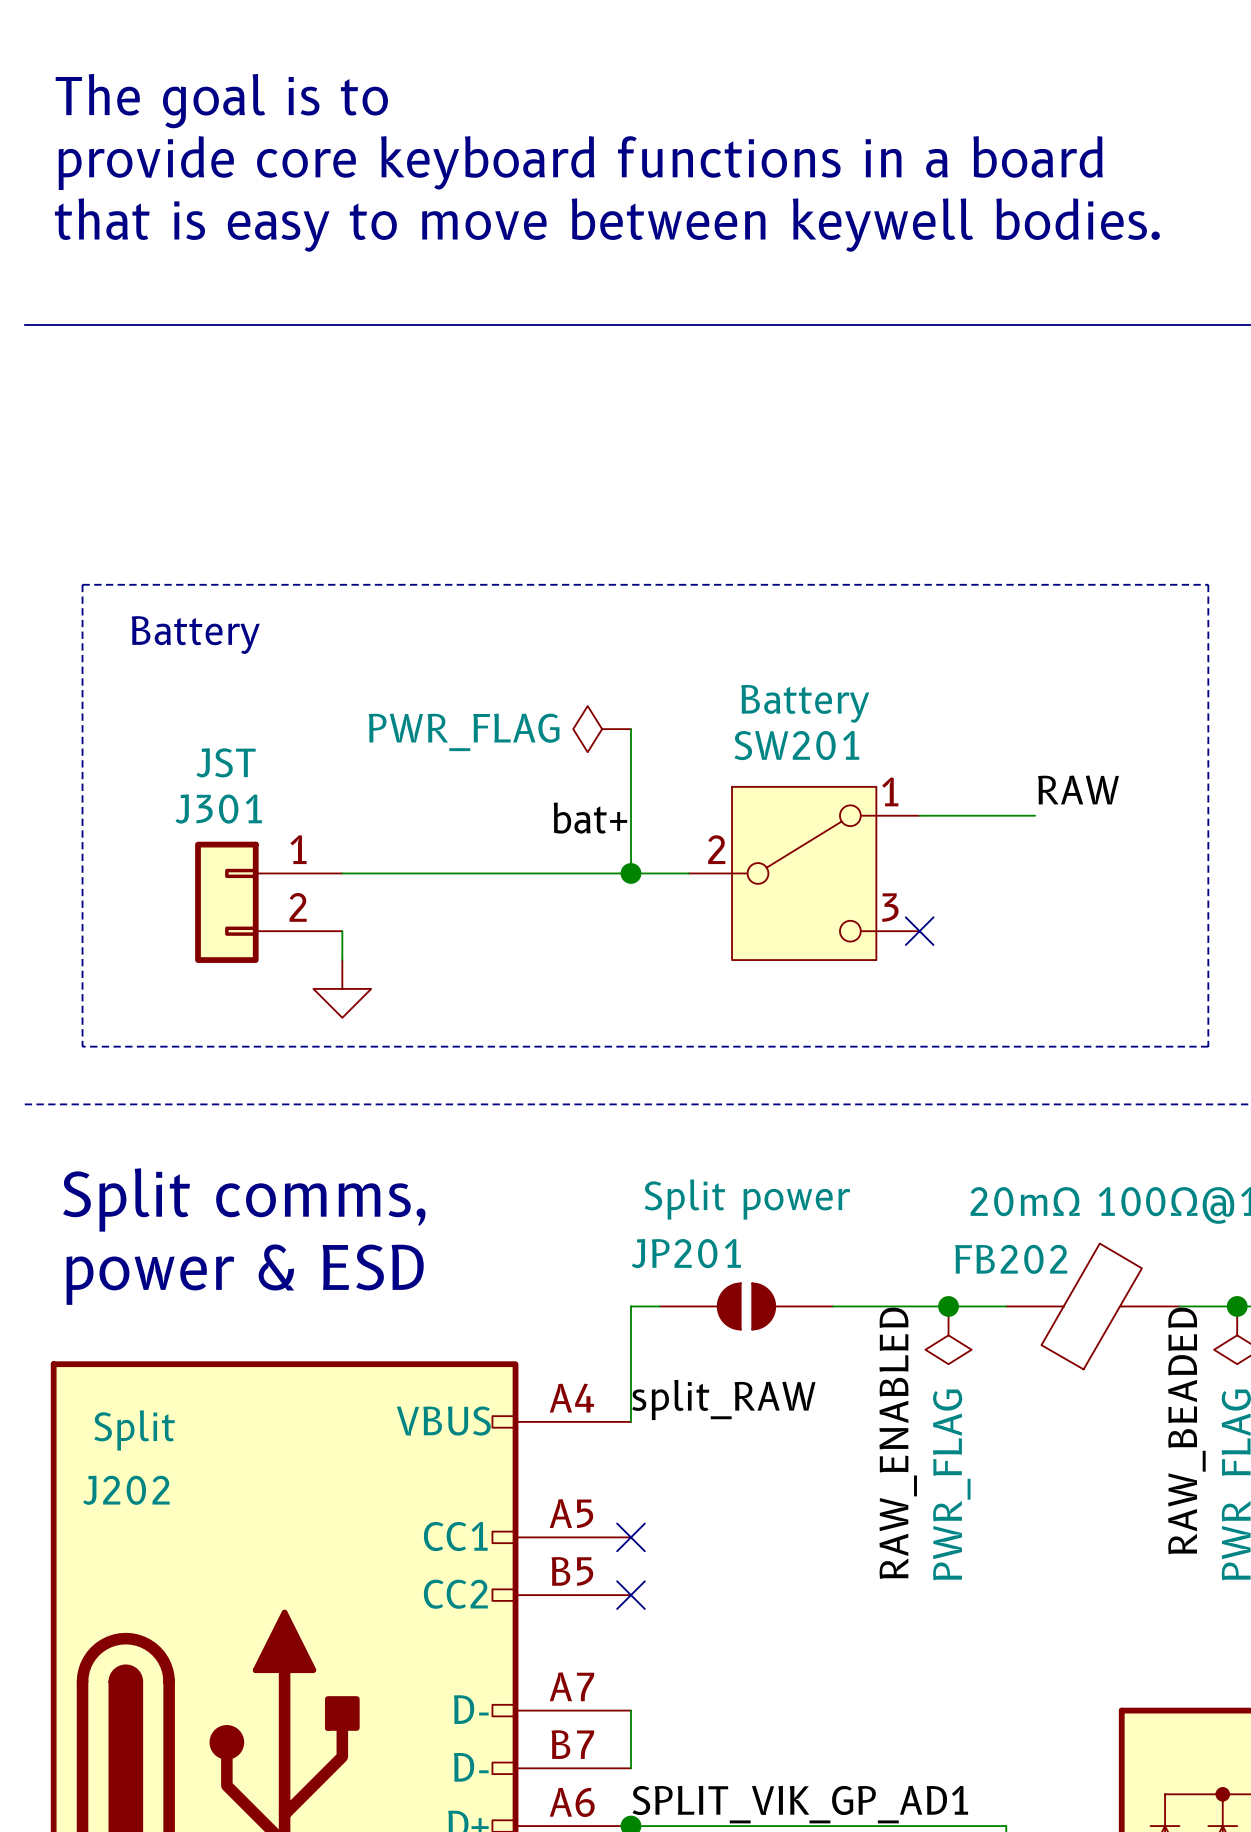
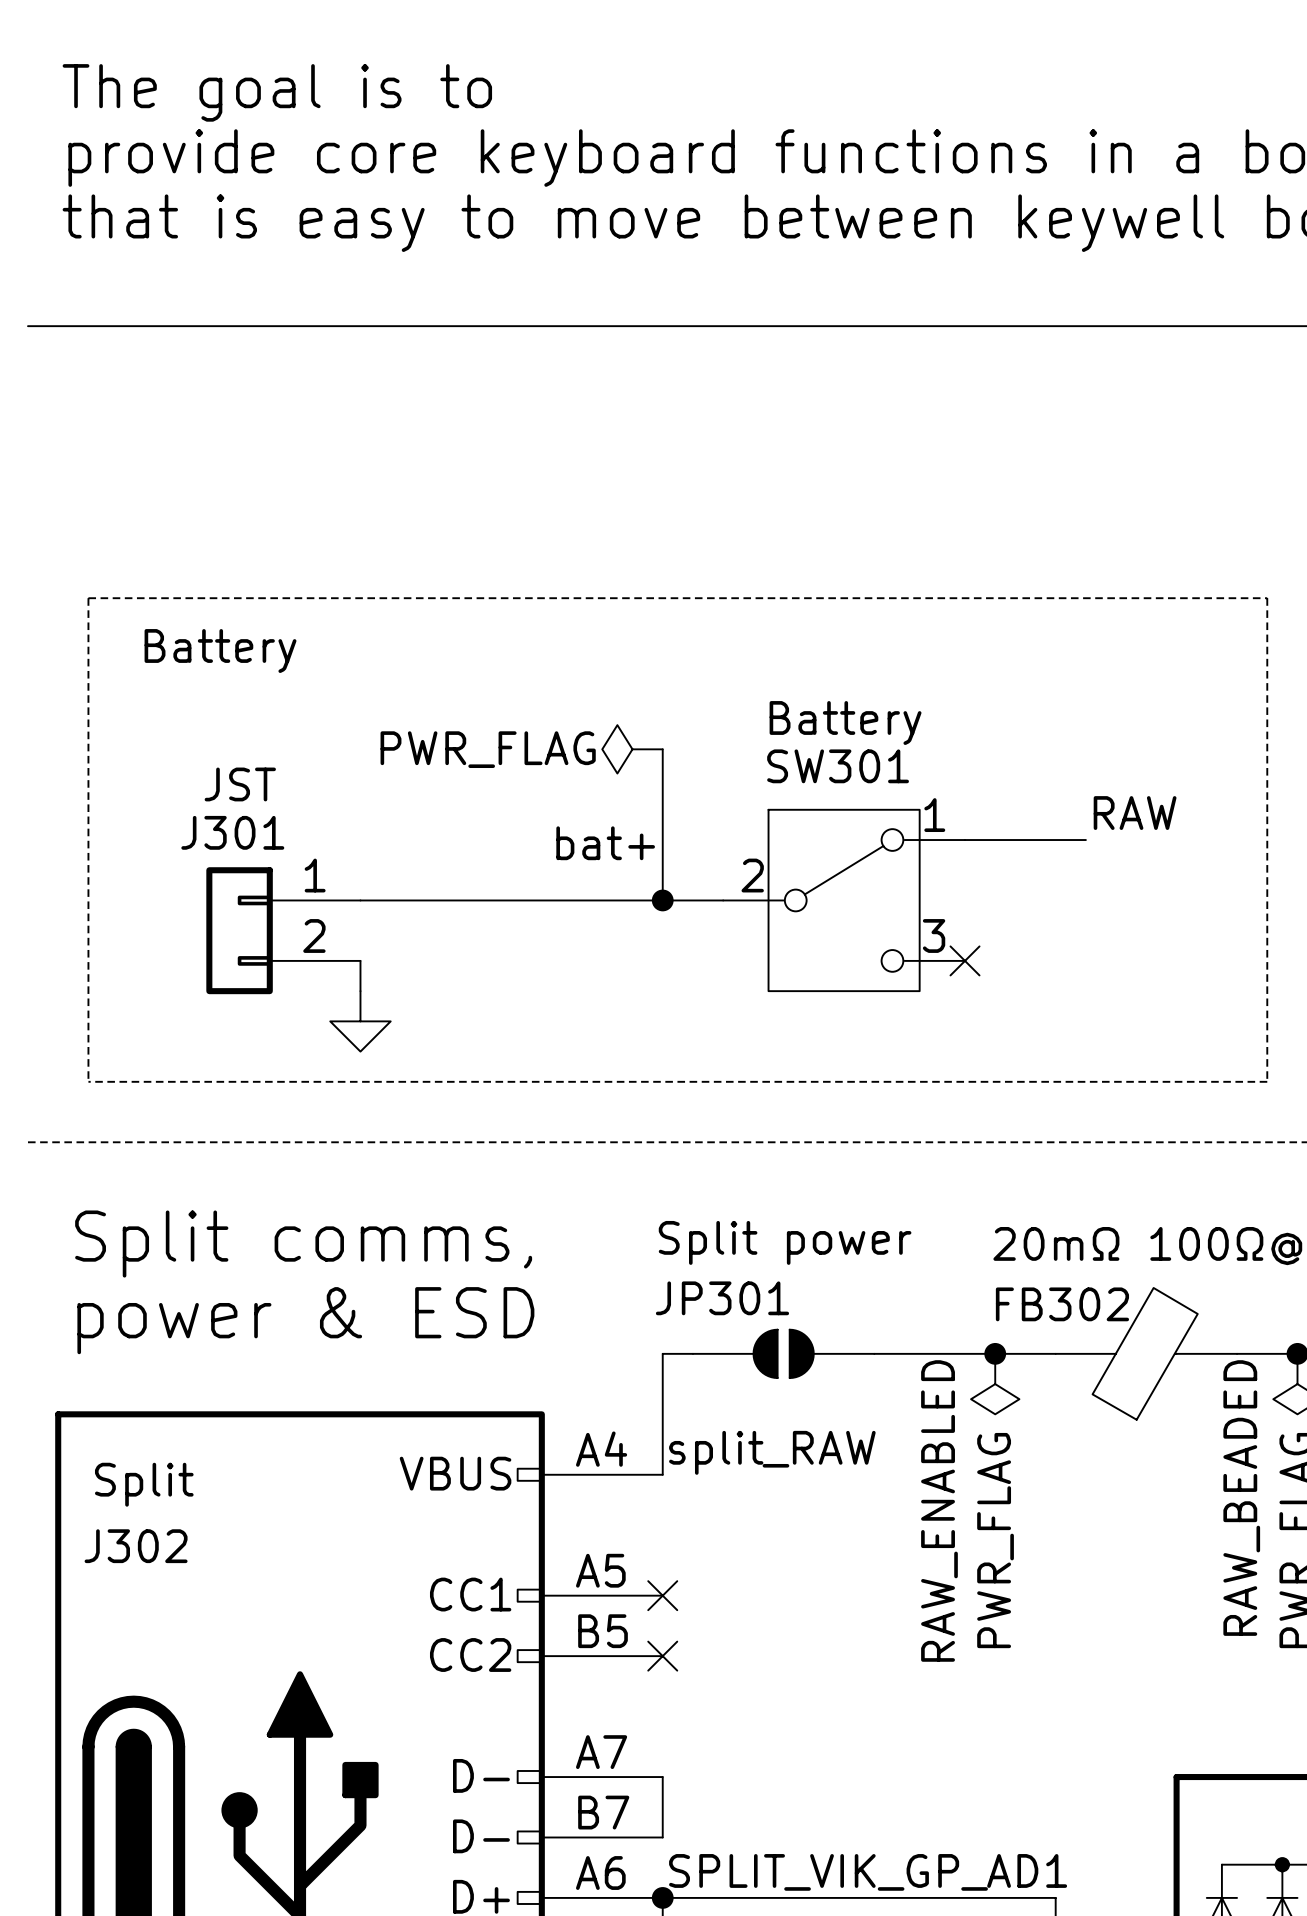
SW201 name: SW201 (796, 745) -> SW301 (838, 766)
JP201 name: JP201 (686, 1253) -> JP301 (722, 1298)
FB202 name: FB202 (1011, 1259) -> FB302 (1062, 1304)
J202 name: J202 (126, 1490) -> J302 (136, 1546)

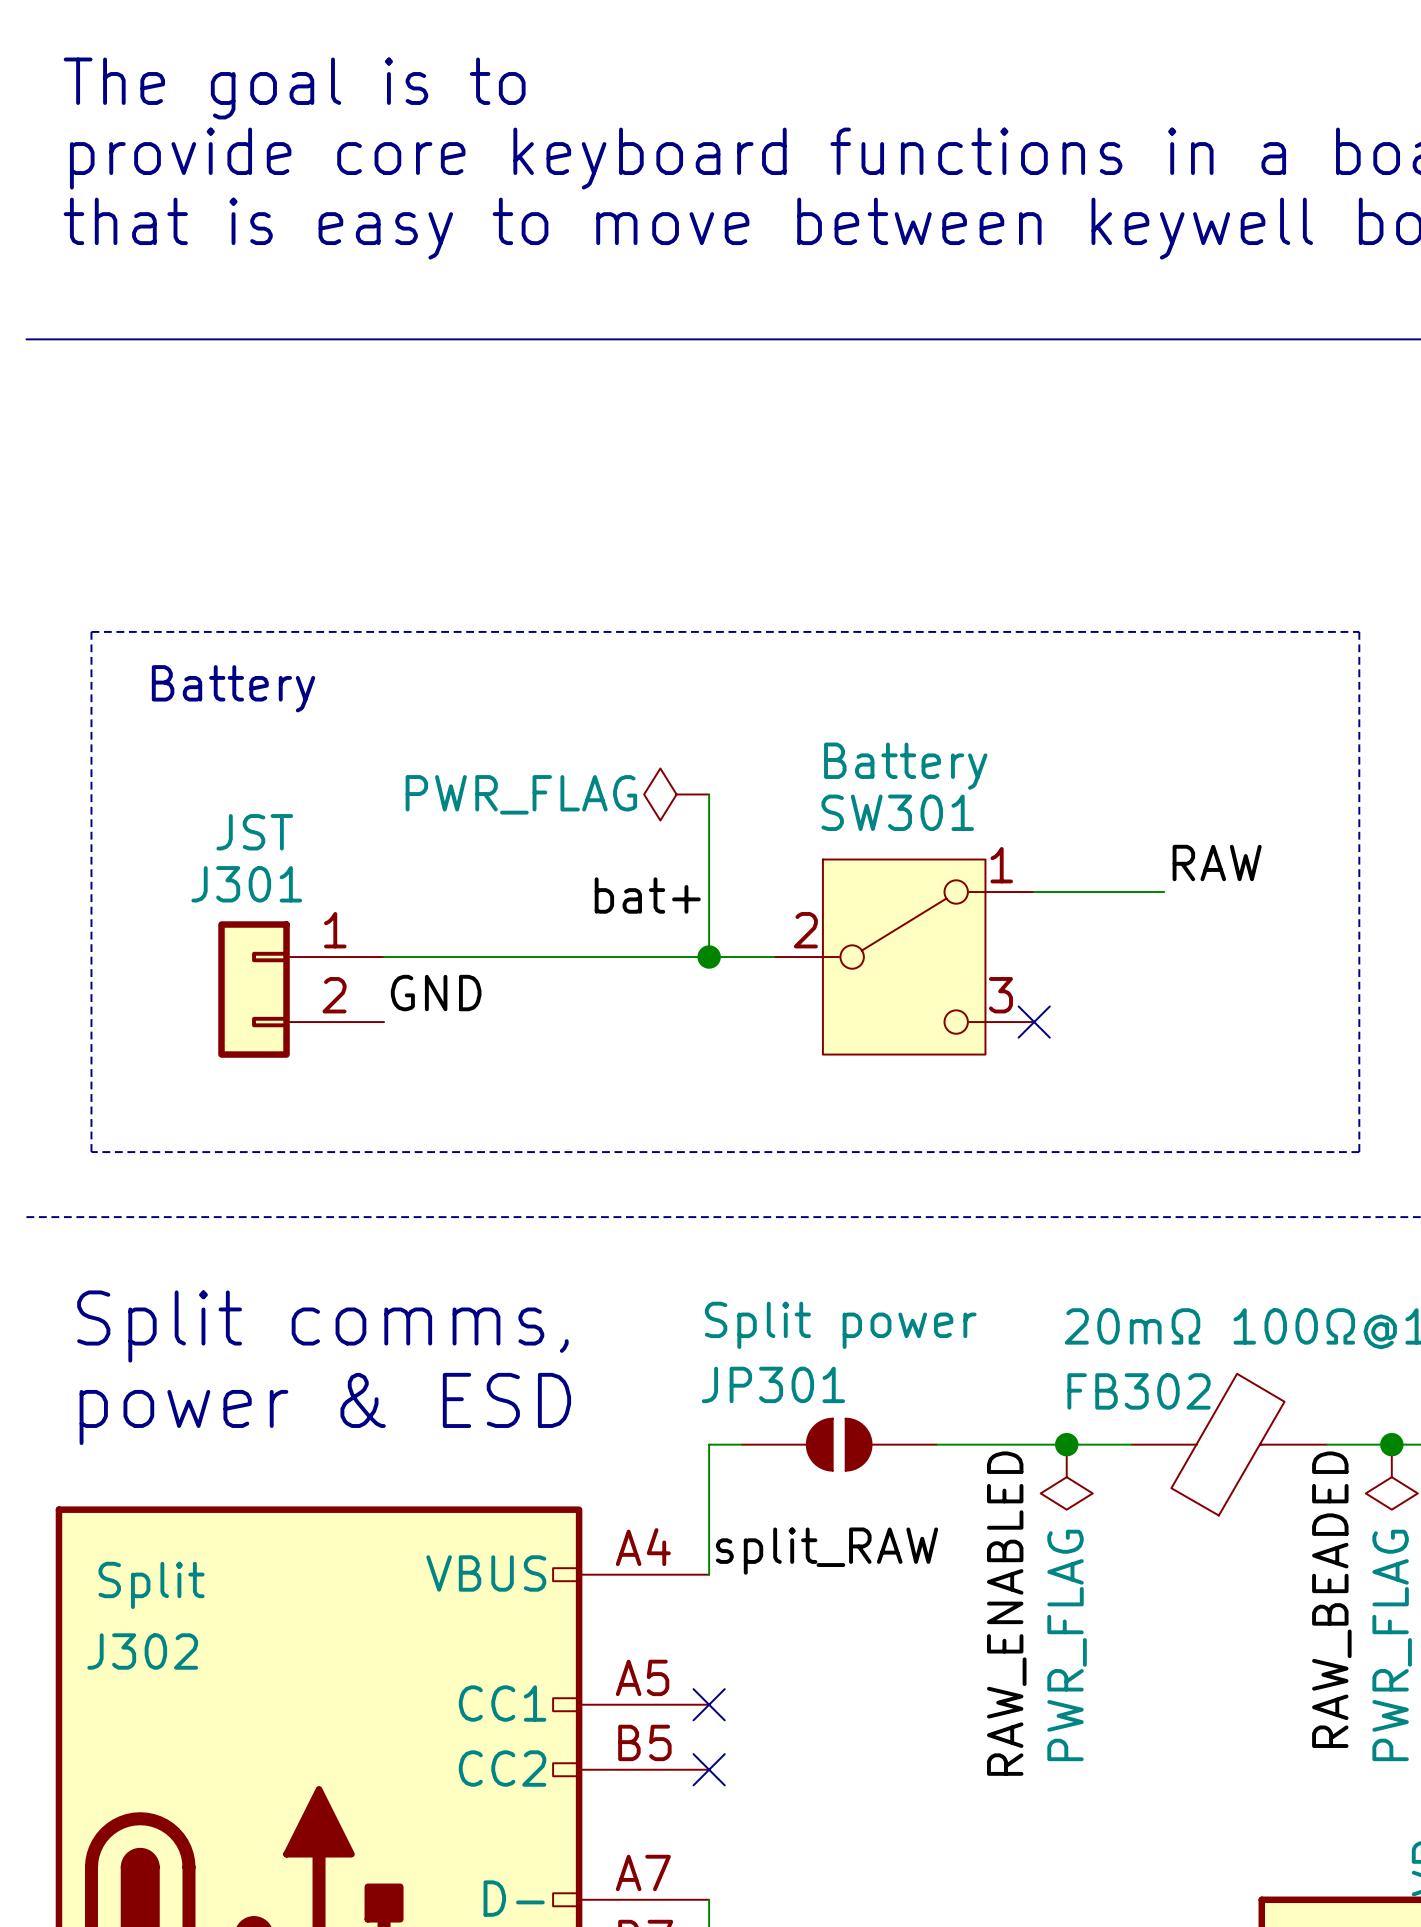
label: none -> GND (436, 993)
wire: (360, 960) (360, 991) -> none
power symbol: (360, 1021) -> none

